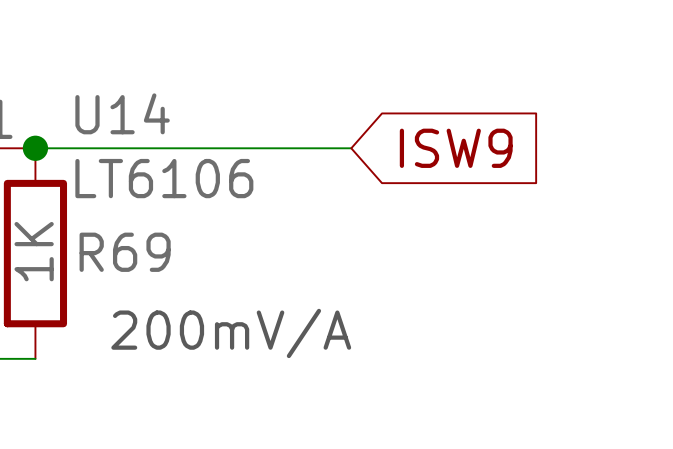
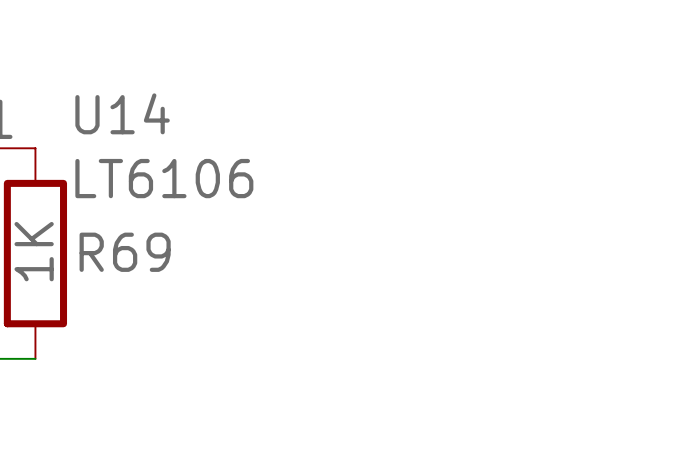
wire: (35, 148) (351, 148) -> none
junction: (35, 148) -> none
global label: ISW9 (456, 148) -> none
text: 200mV/A (231, 333) -> none

